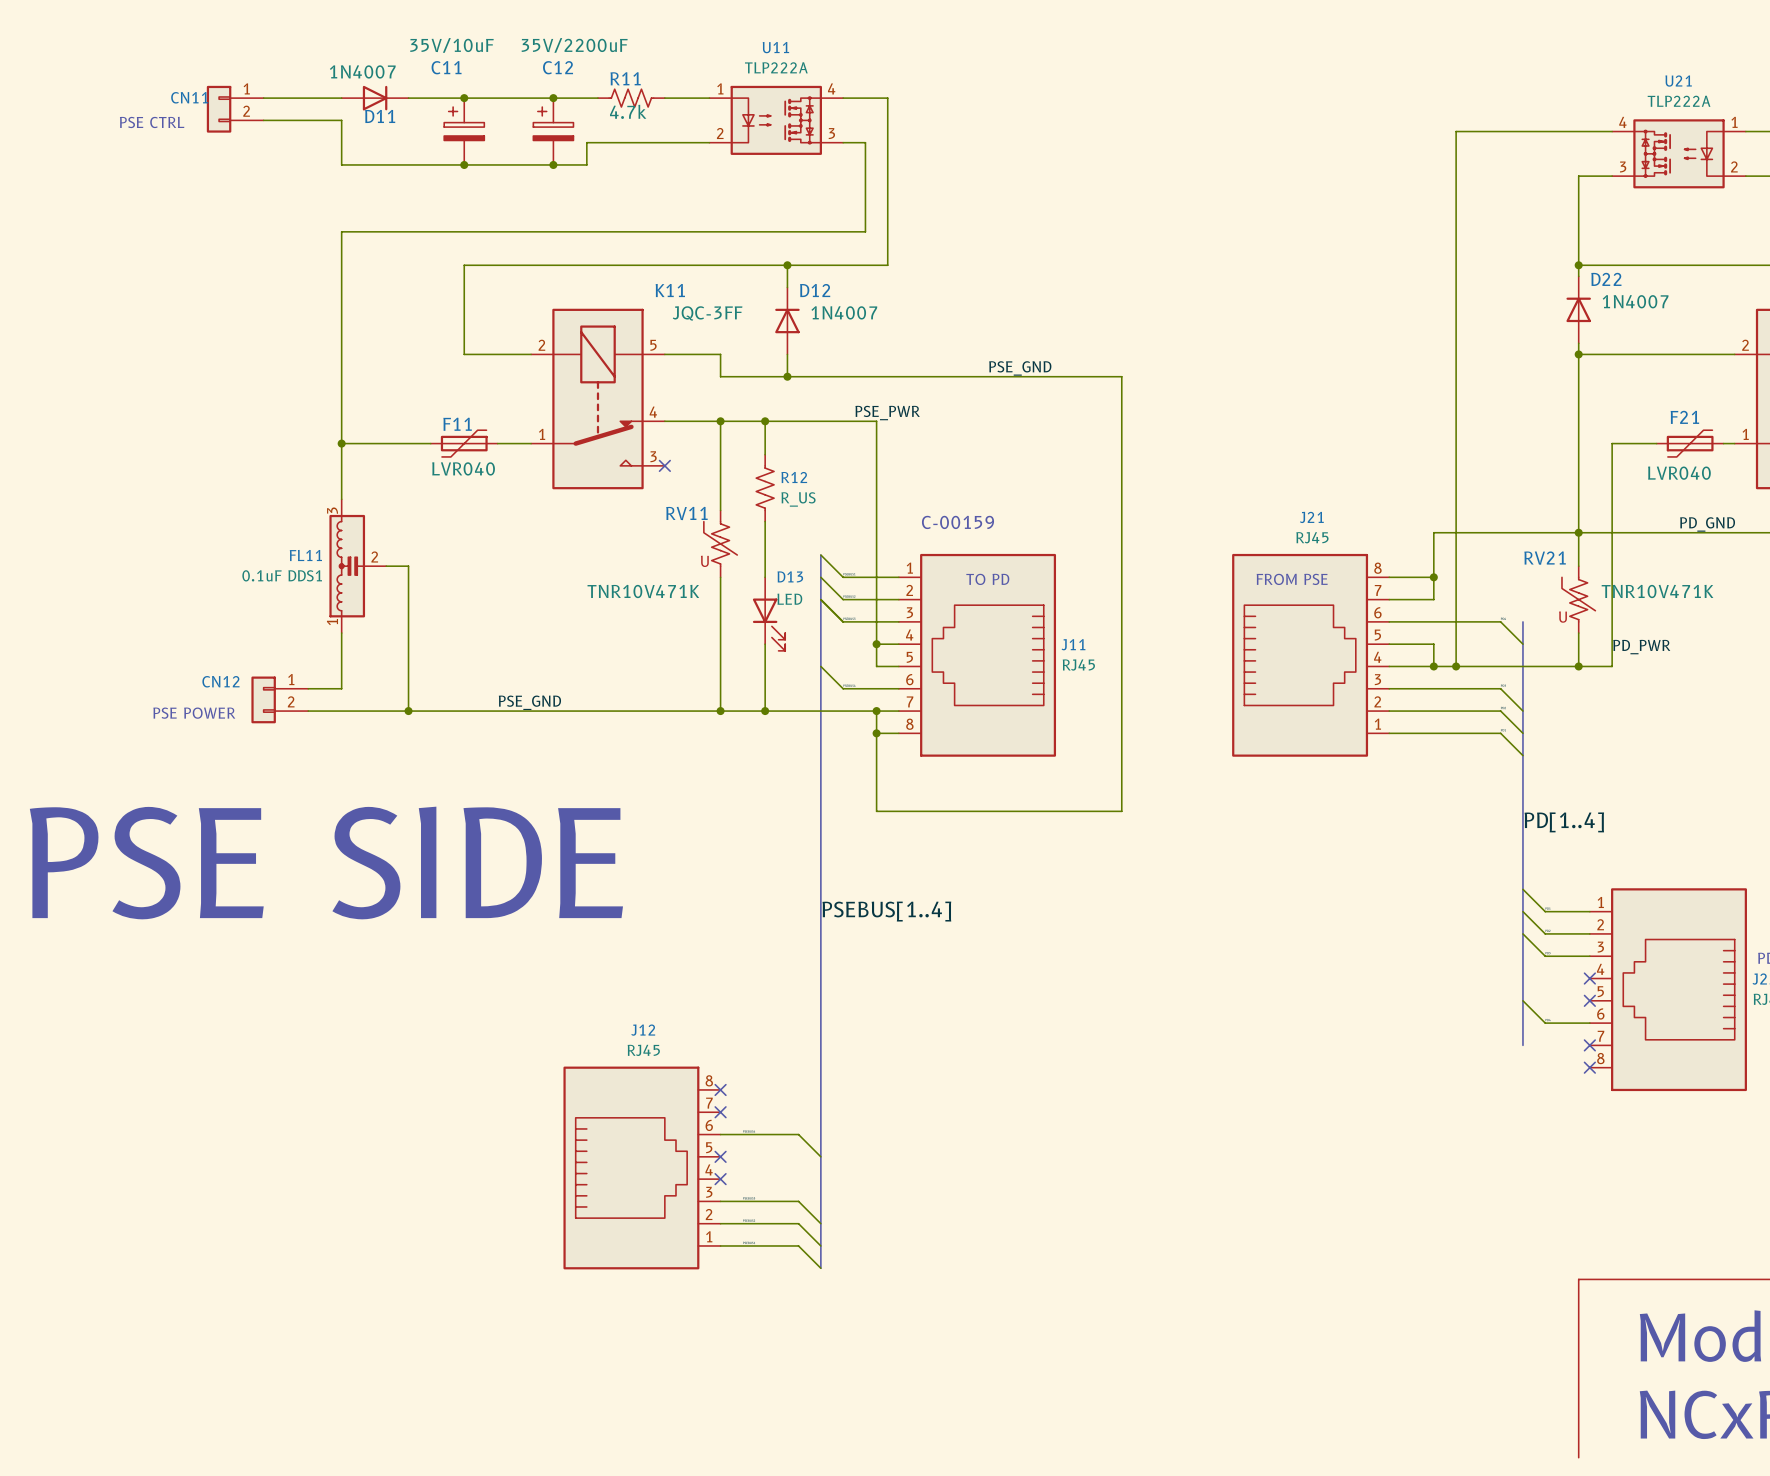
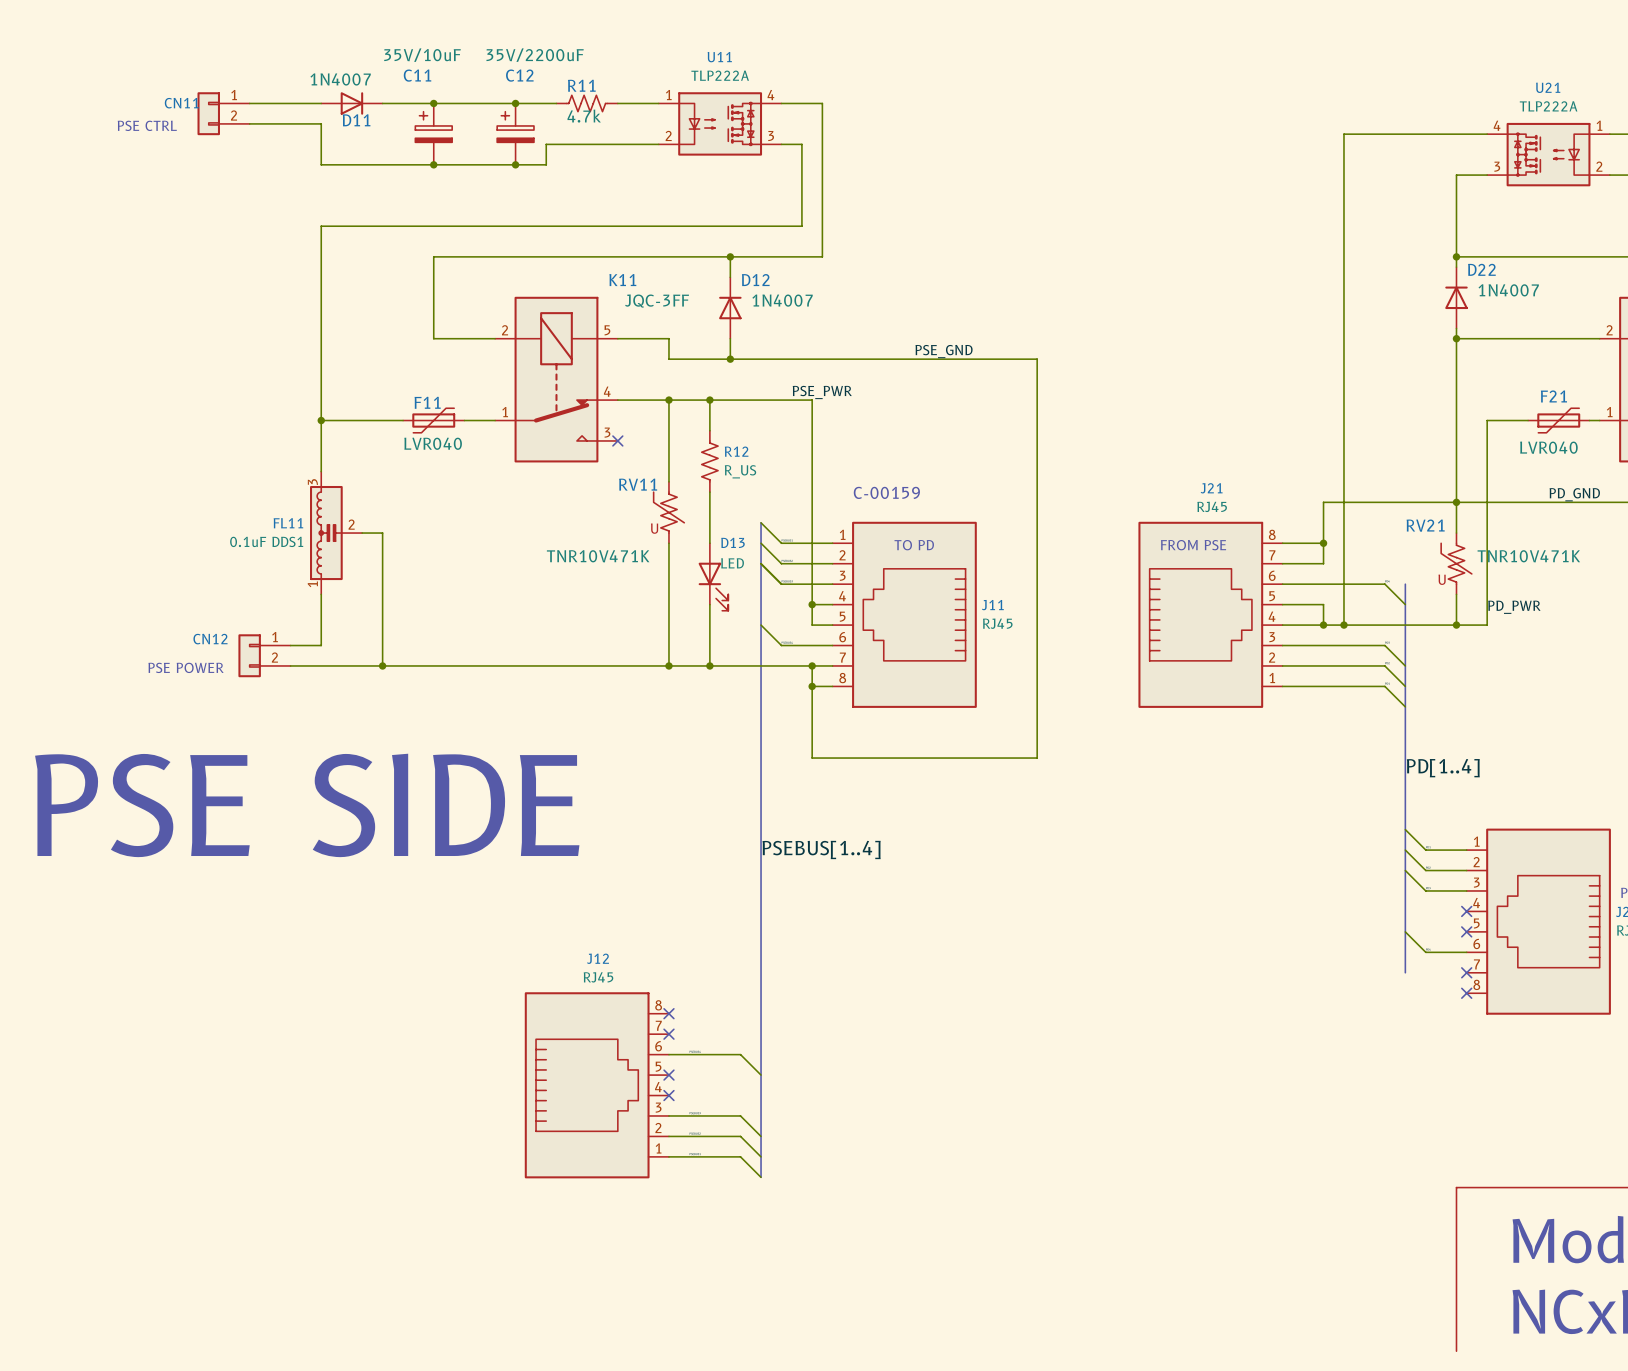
label: PSE_GND (529, 702) -> none

